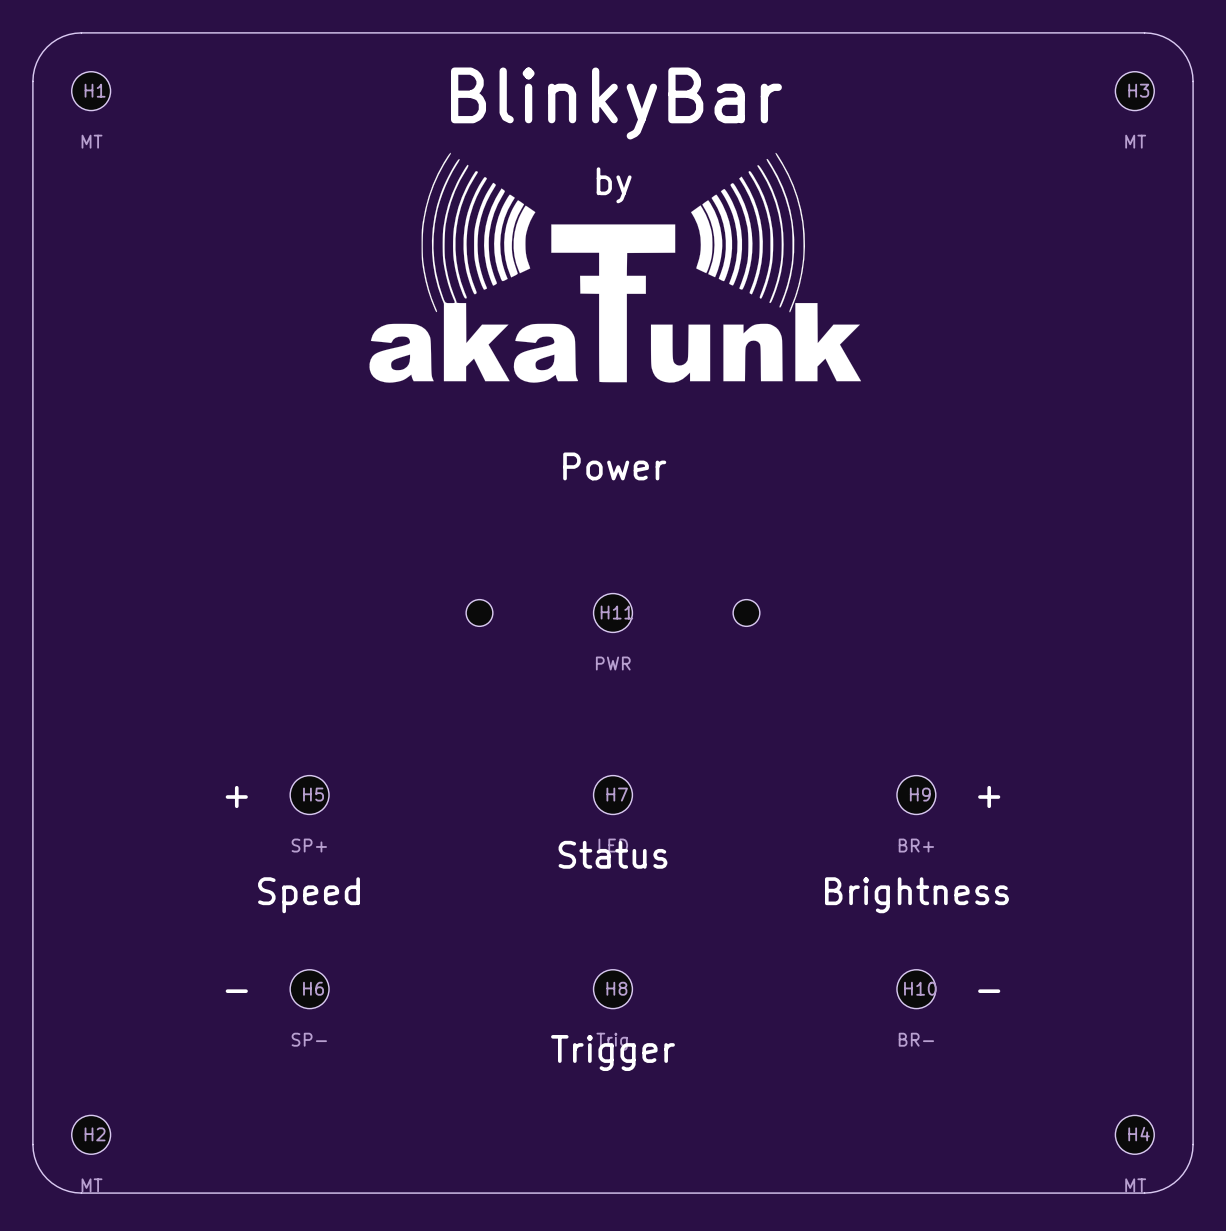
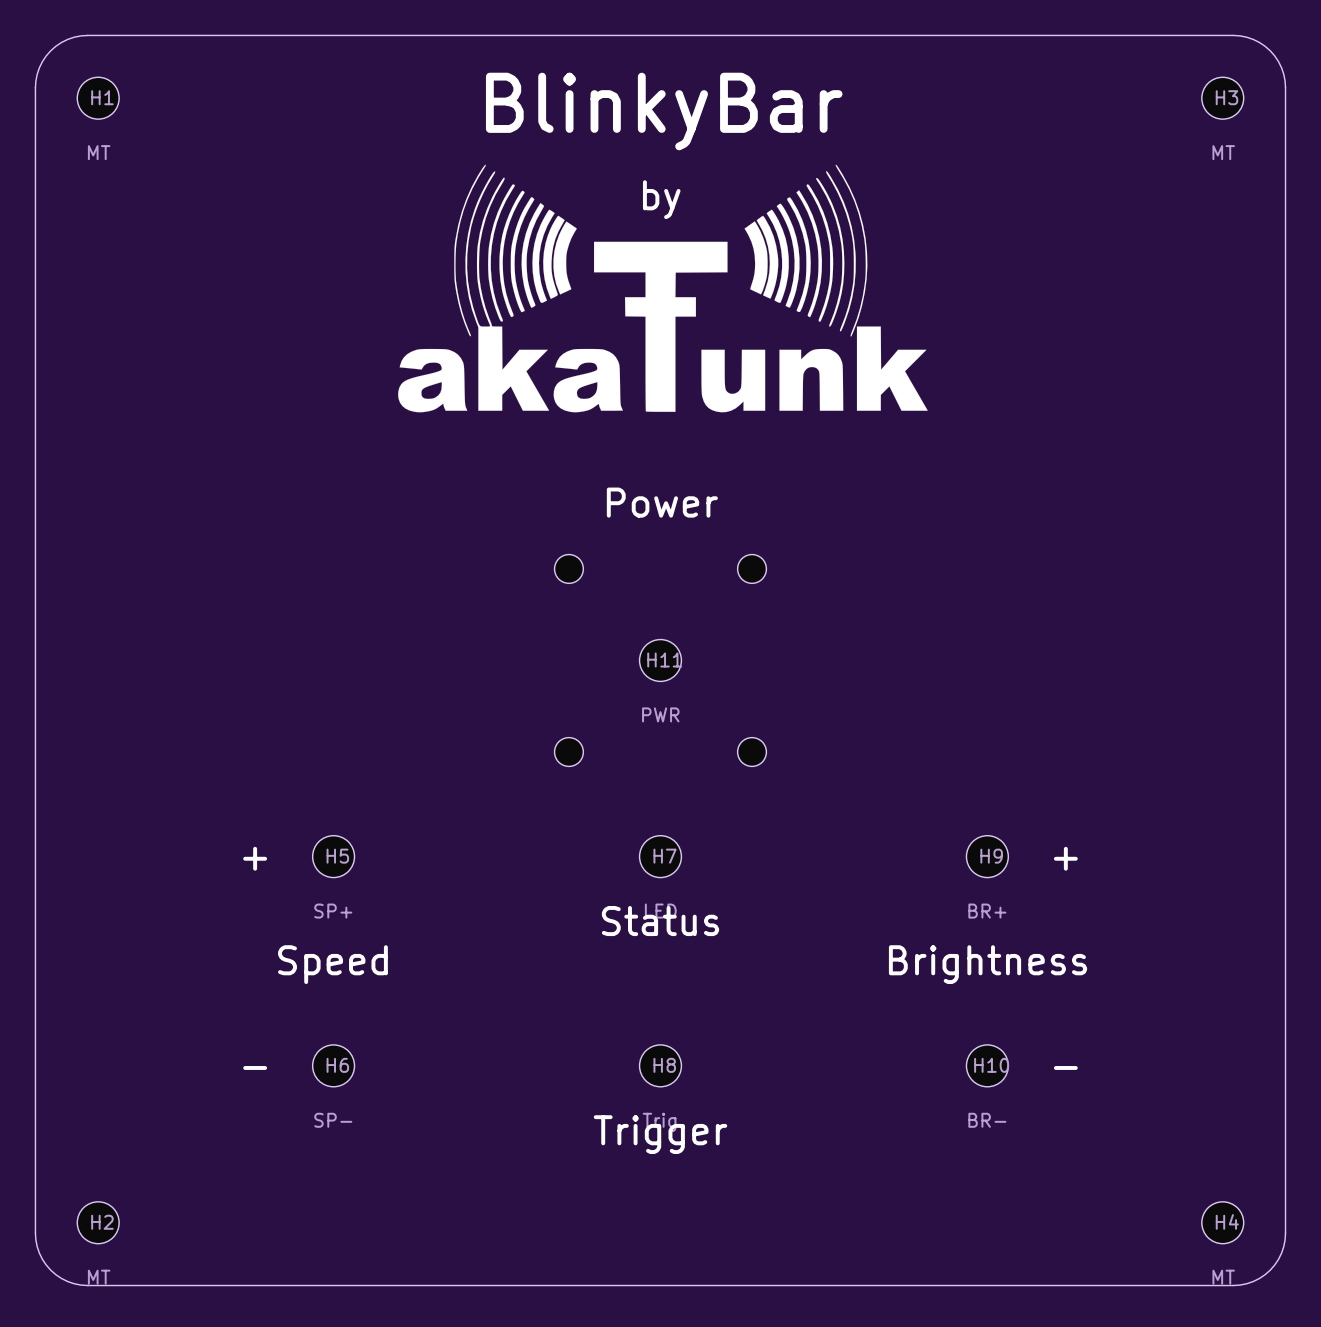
H11 footprint: [466, 593, 760, 633] -> [554, 554, 767, 767]

